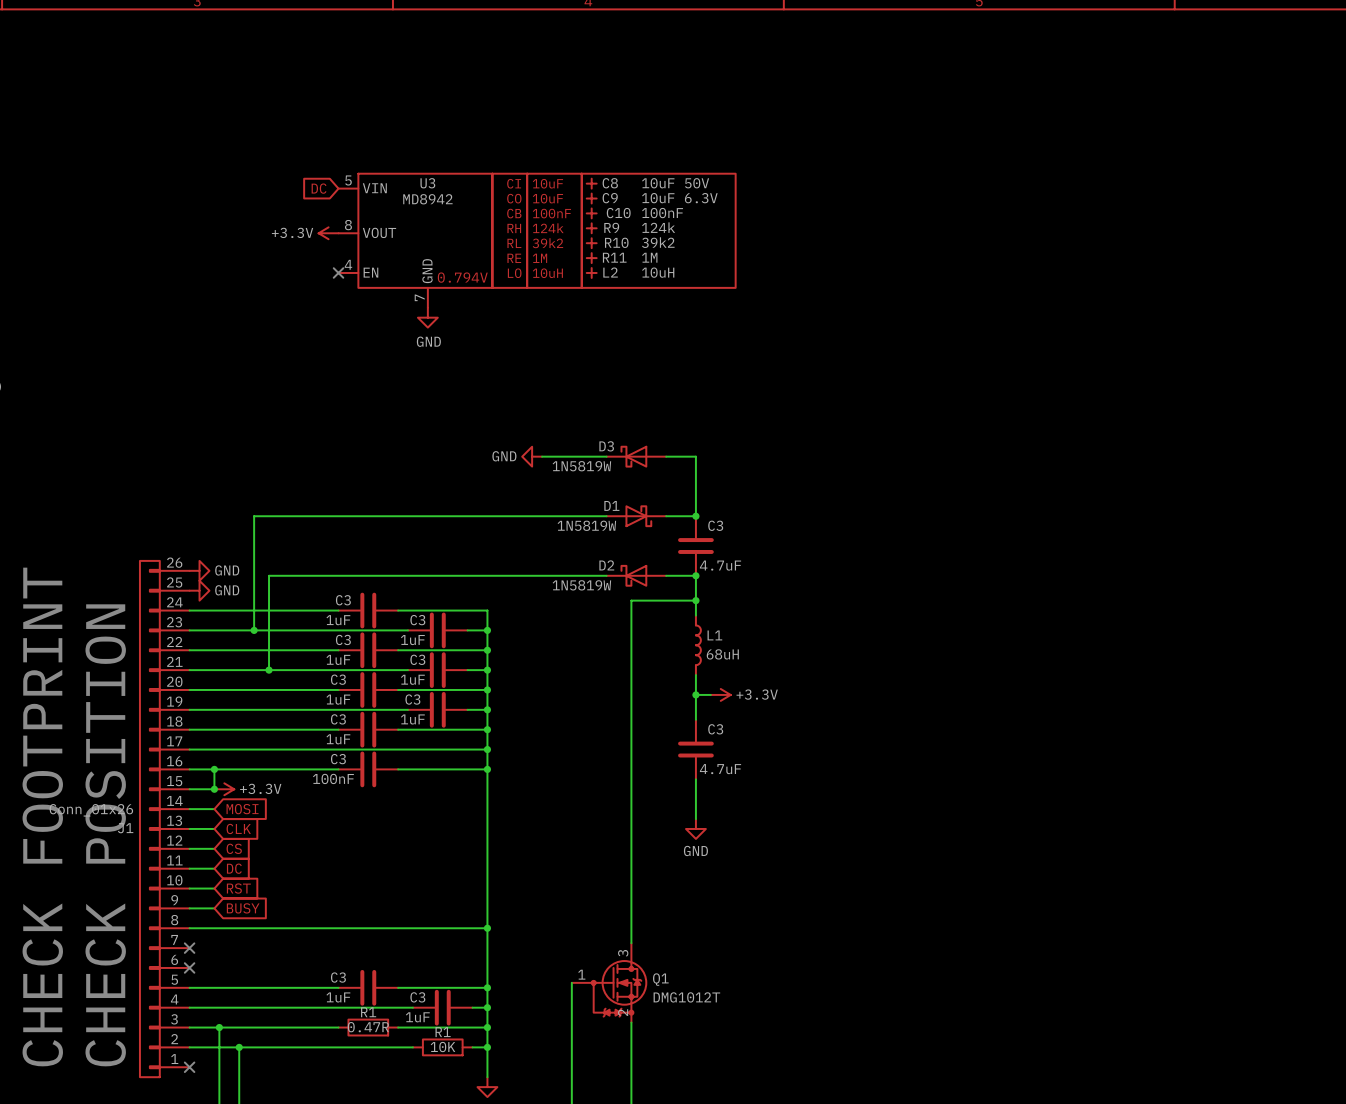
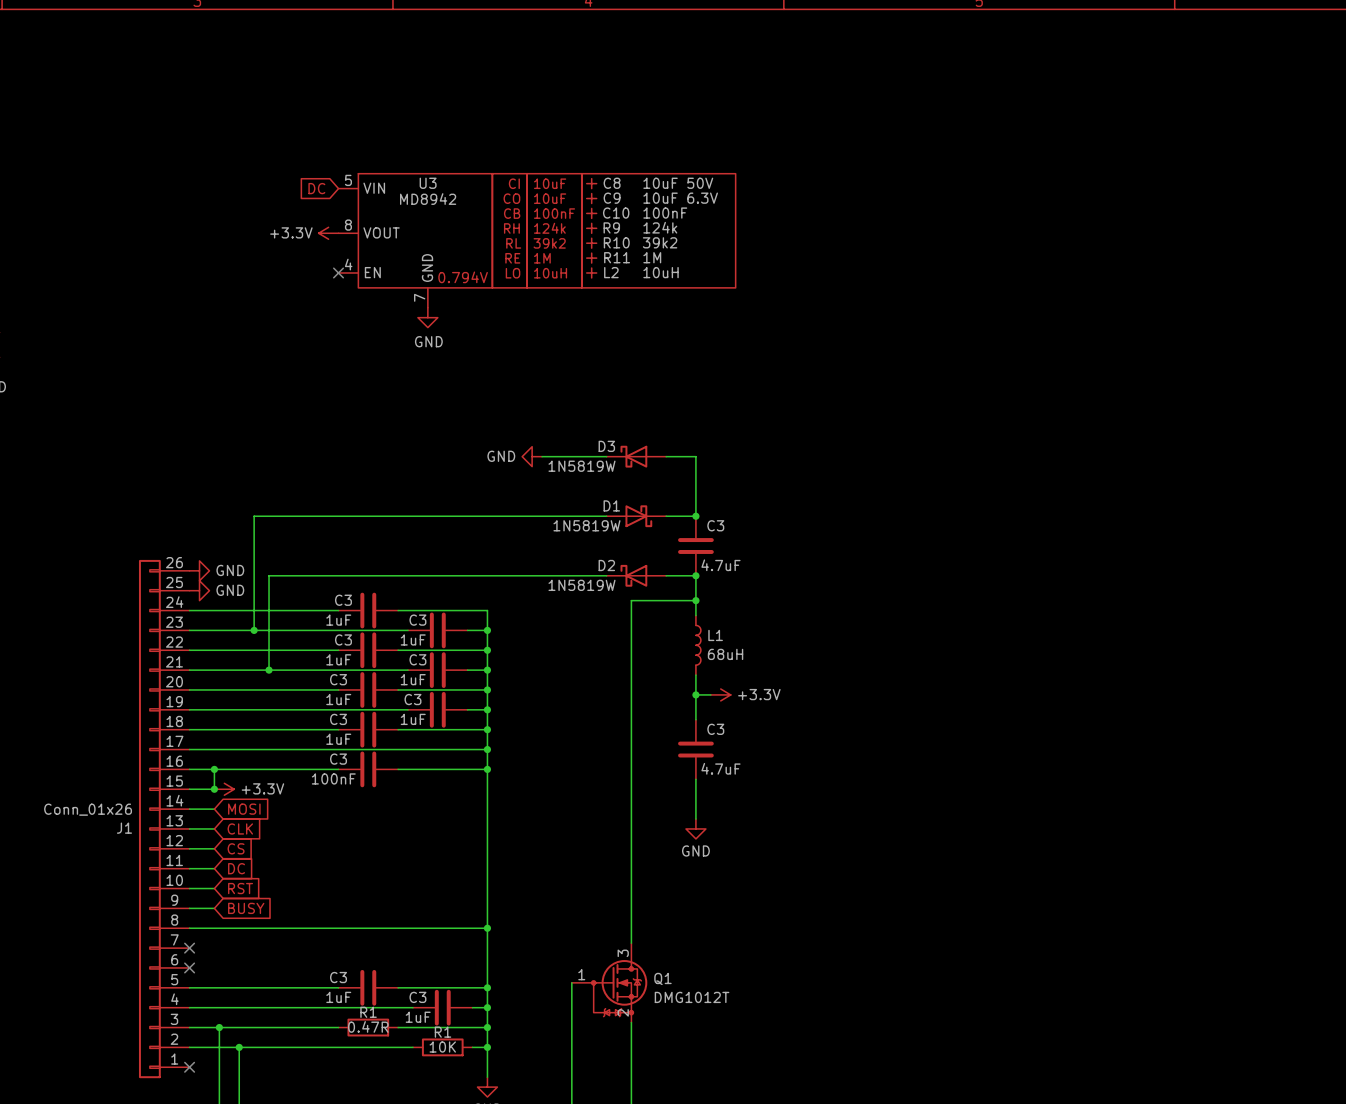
text: CHECK FOOTPRINT (42, 816) -> none
text: CHECK POSITION (105, 835) -> none

